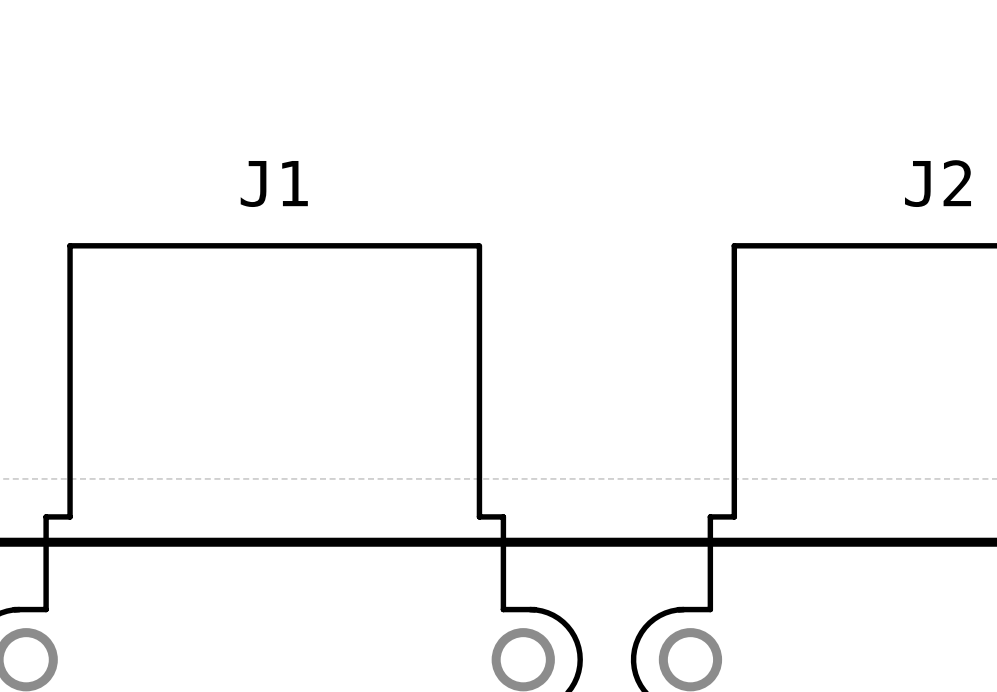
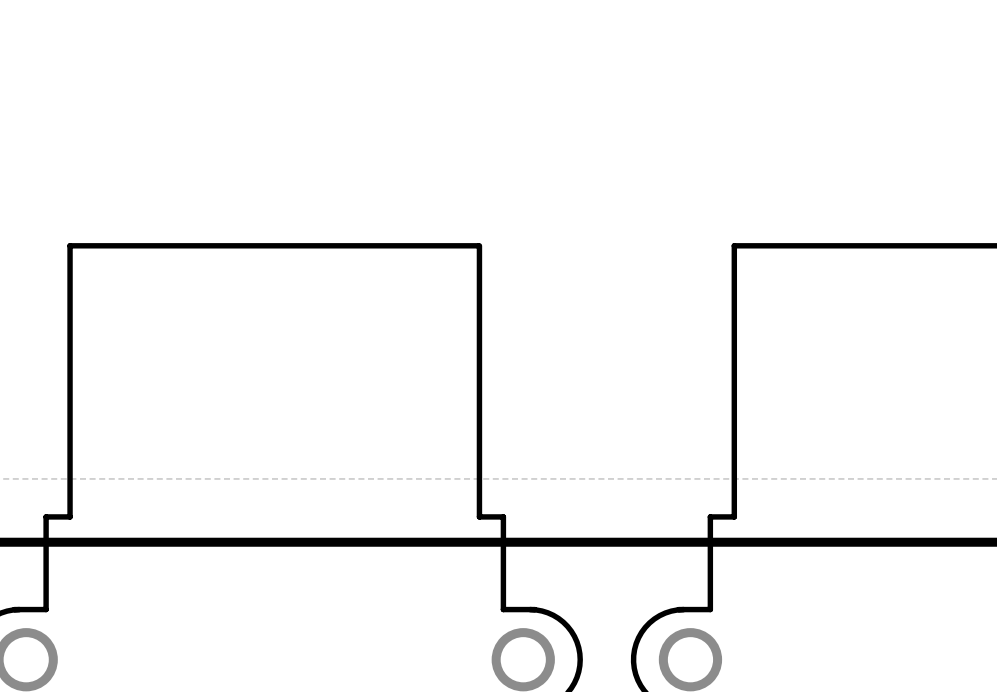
J2 name: J2 (938, 183) -> none
J1 name: J1 (274, 184) -> none

